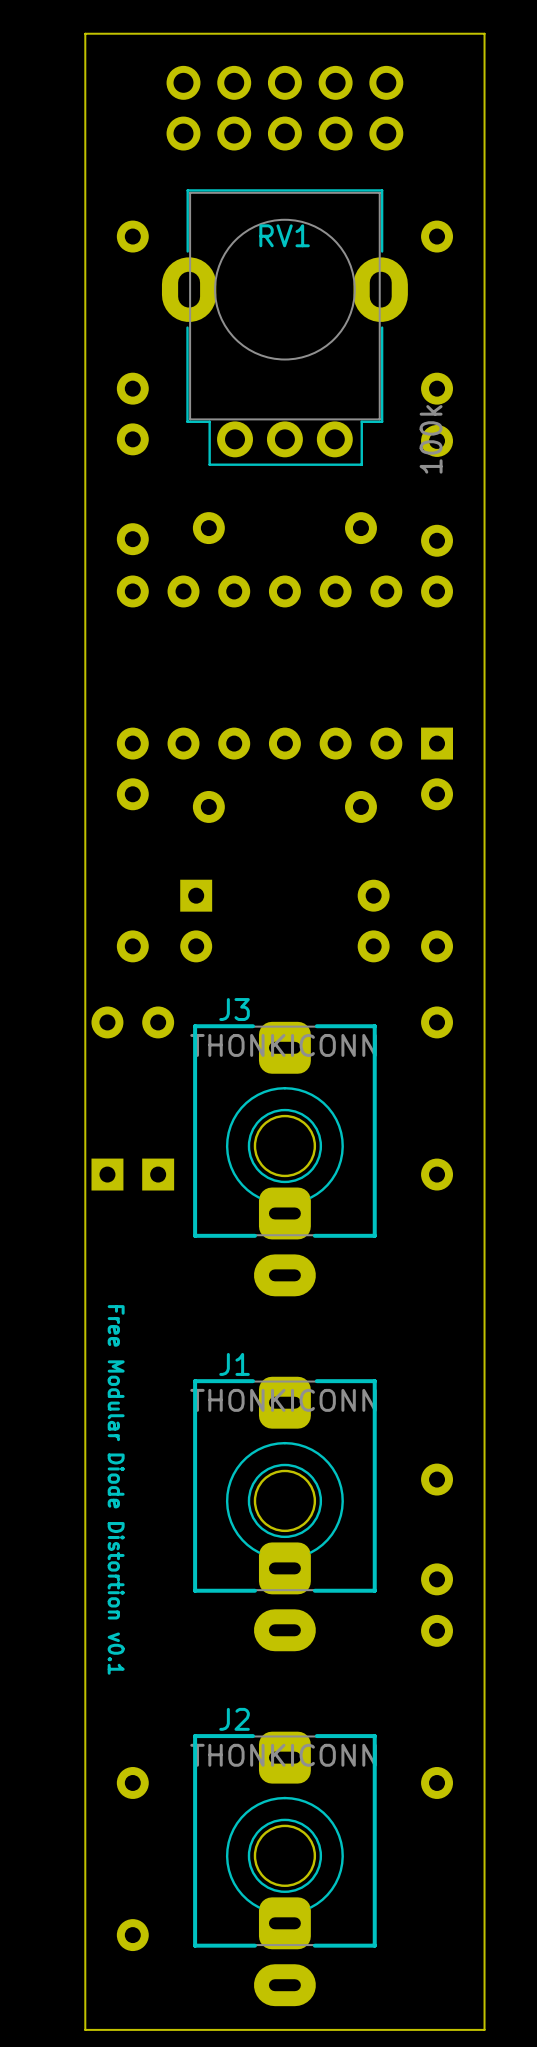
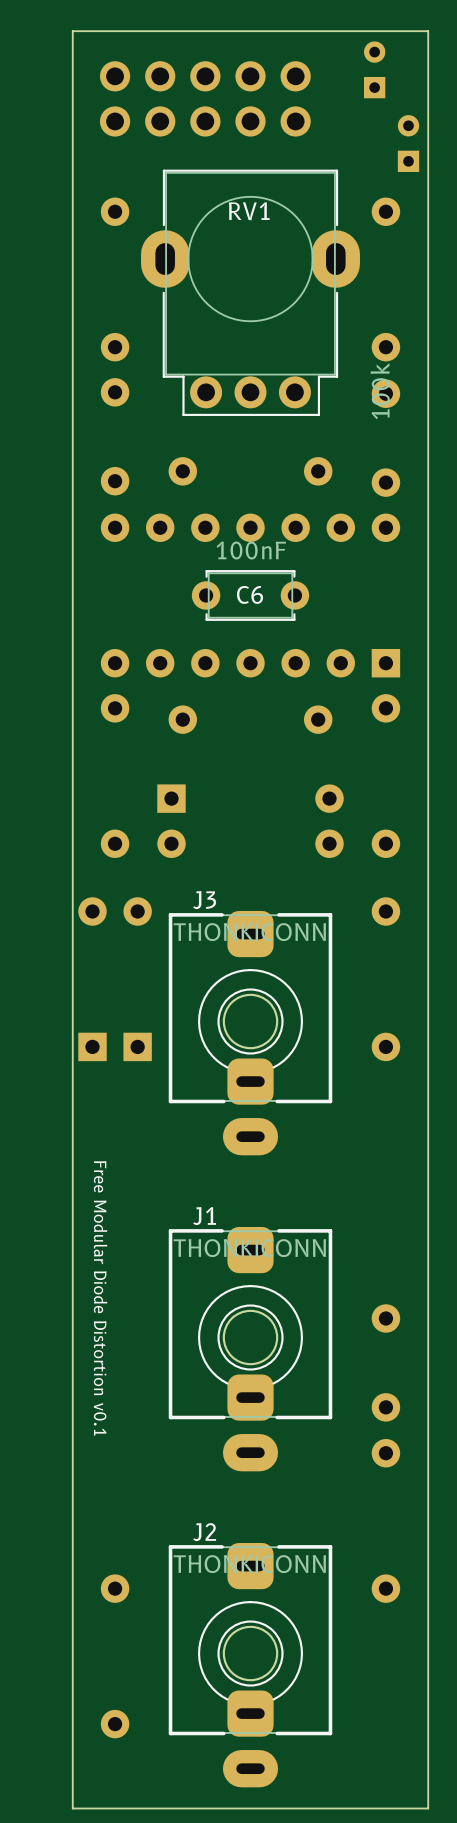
part: none -> (374, 69)
part position: (284, 108) -> (205, 98)
part: none -> (408, 143)
C6: none -> 100nF (250, 595)

